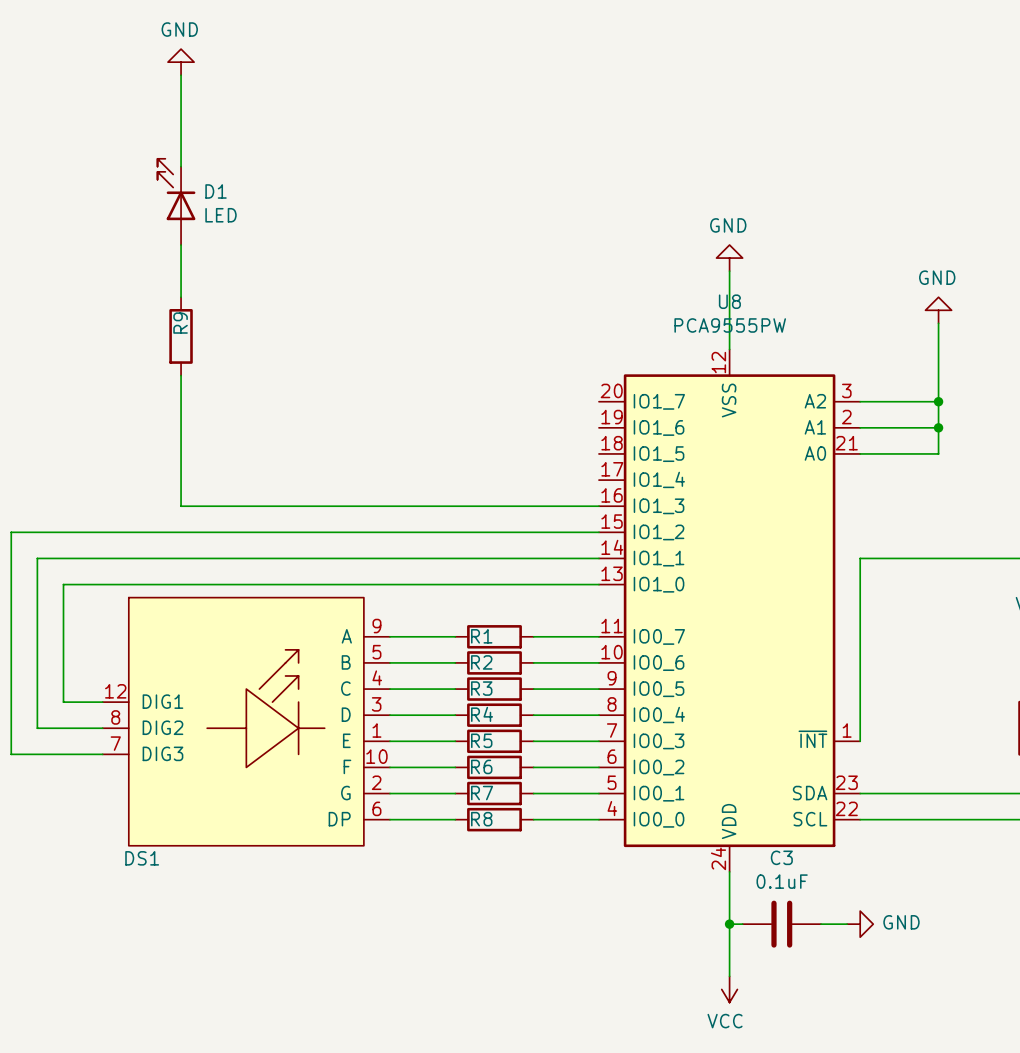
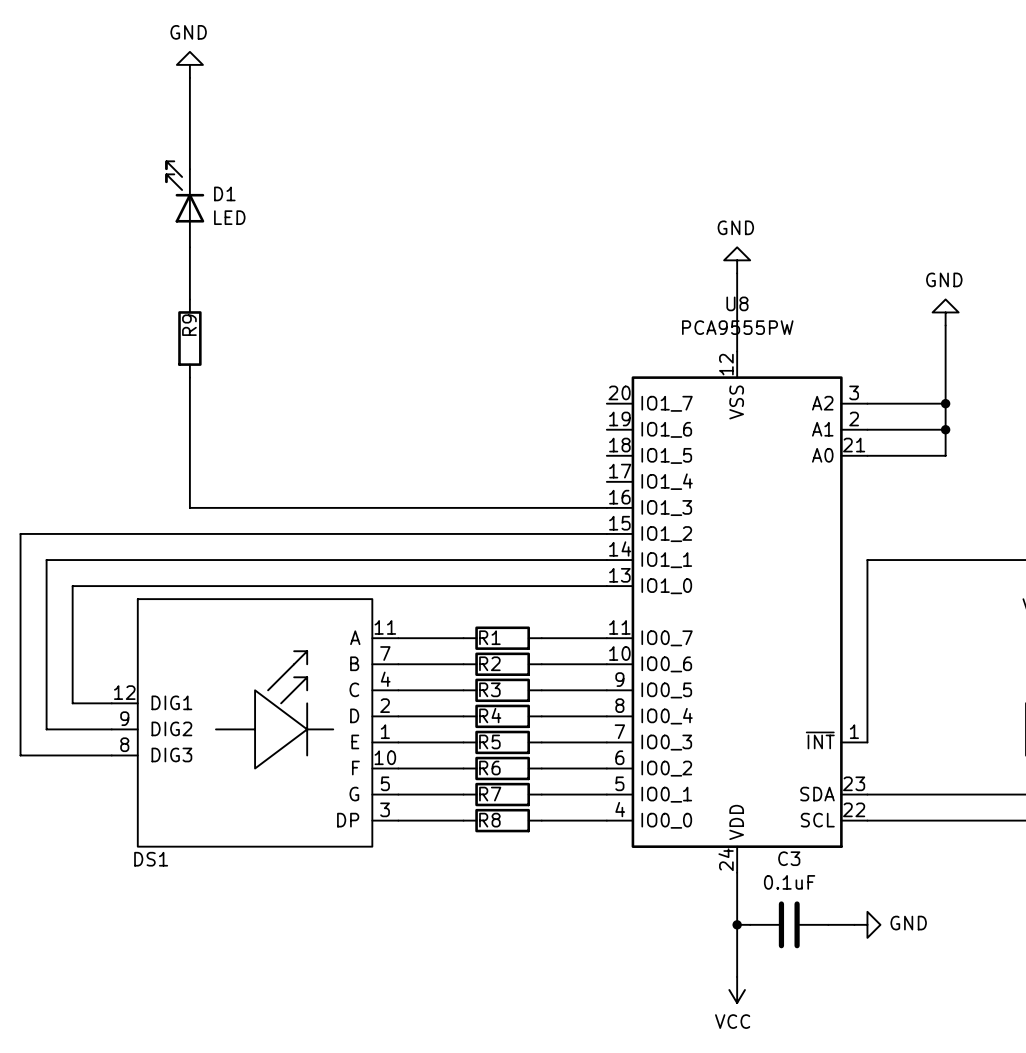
DS1 pin number: 9 (376, 626) -> 11 (385, 627)
DS1 pin number: 5 (376, 652) -> 7 (385, 653)
DS1 pin number: 3 (376, 704) -> 2 (385, 705)
DS1 pin number: 8 (115, 717) -> 9 (124, 718)
DS1 pin number: 7 (115, 743) -> 8 (124, 744)
DS1 pin number: 2 (376, 782) -> 5 (385, 783)
DS1 pin number: 6 (376, 808) -> 3 (385, 809)

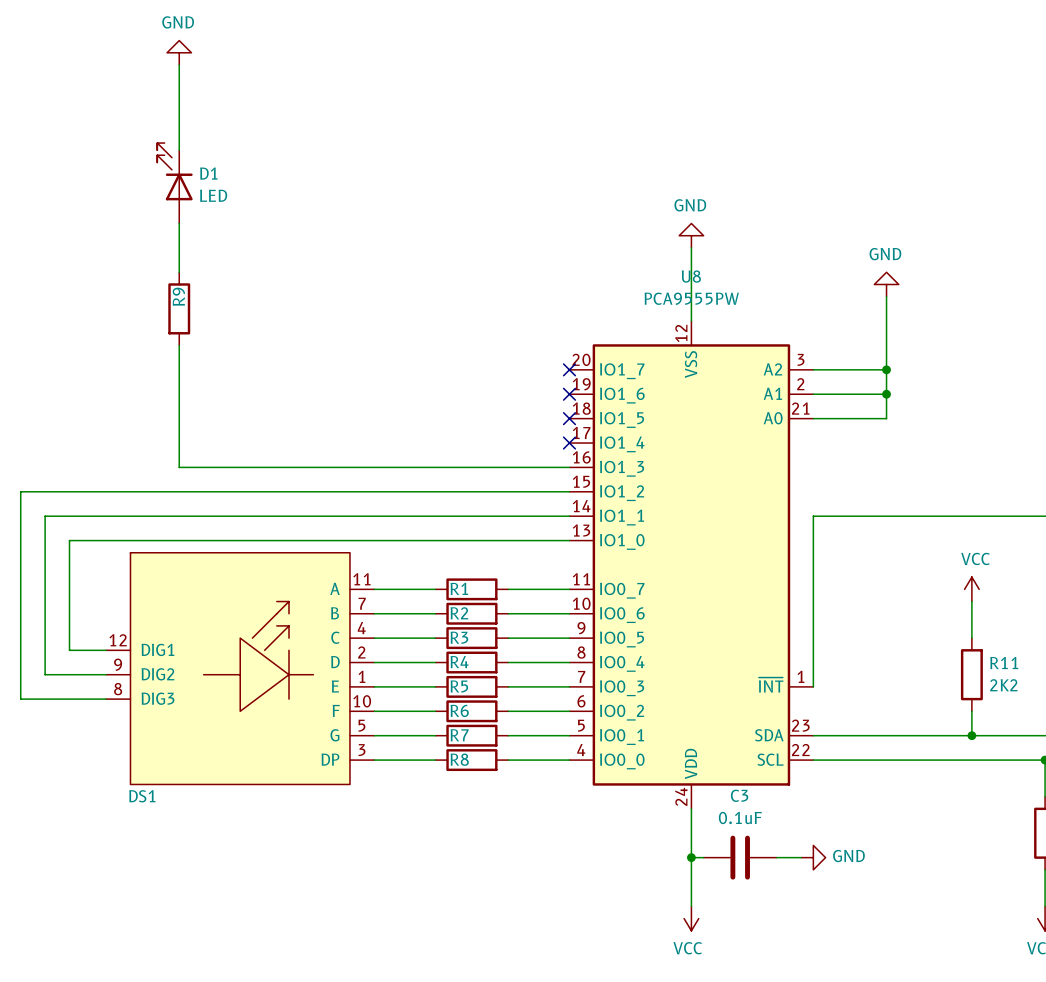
no-connect mark: none -> (569, 369)
no-connect mark: none -> (569, 394)
no-connect mark: none -> (569, 418)
no-connect mark: none -> (569, 443)

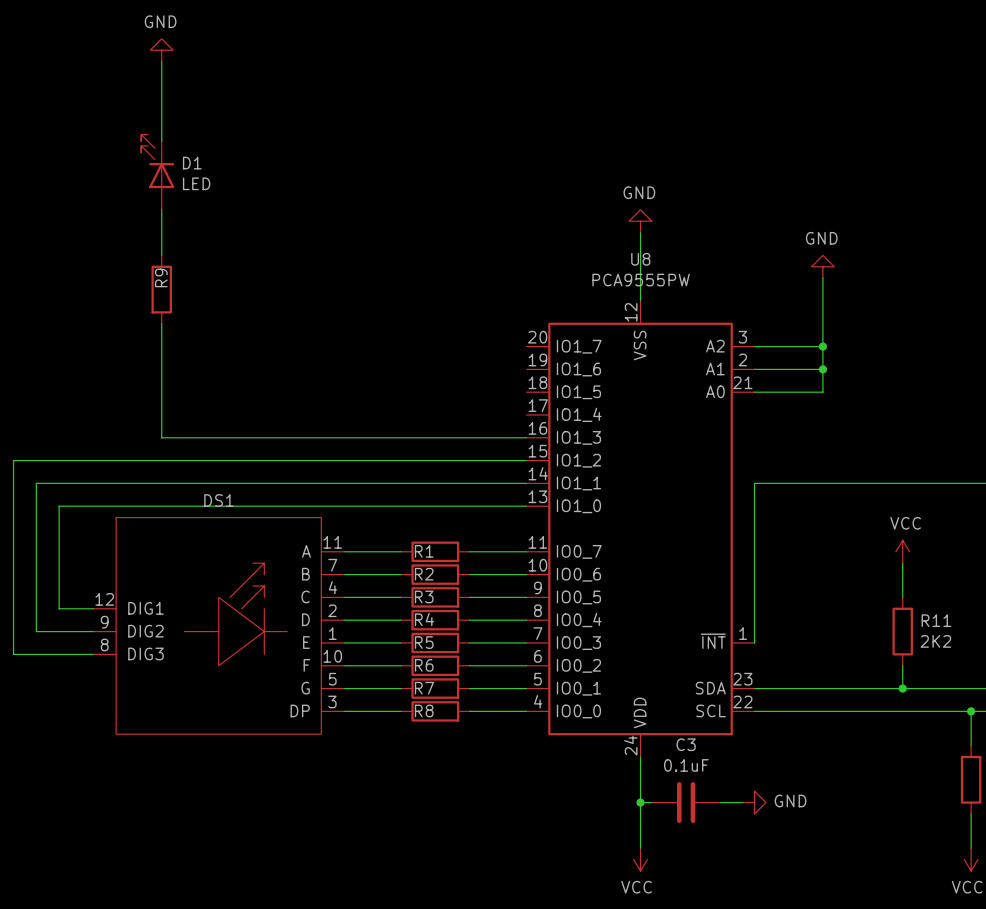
no-connect mark: (569, 369) -> none
no-connect mark: (569, 394) -> none
no-connect mark: (569, 418) -> none
no-connect mark: (569, 443) -> none
DS1 name position: DS1 (142, 796) -> DS1 (219, 500)

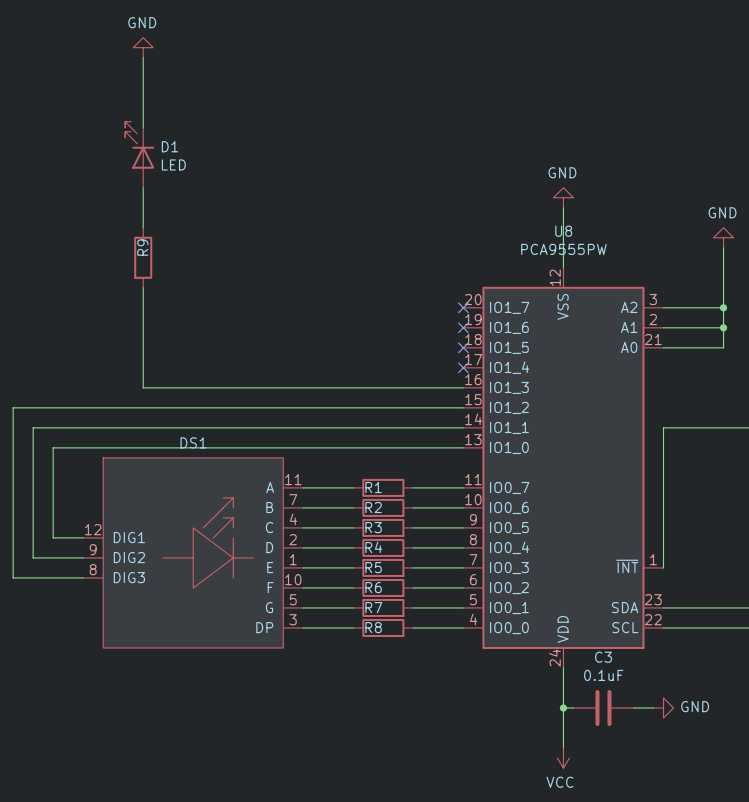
no-connect mark: none -> (463, 307)
no-connect mark: none -> (463, 327)
no-connect mark: none -> (463, 347)
no-connect mark: none -> (463, 367)

